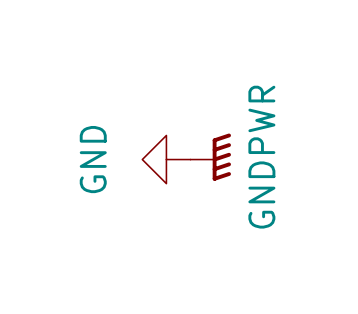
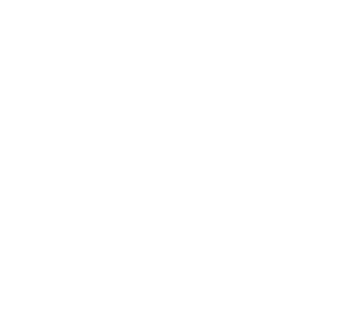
power symbol: GNDPWR (210, 157) -> none
power symbol: GND (166, 159) -> none

